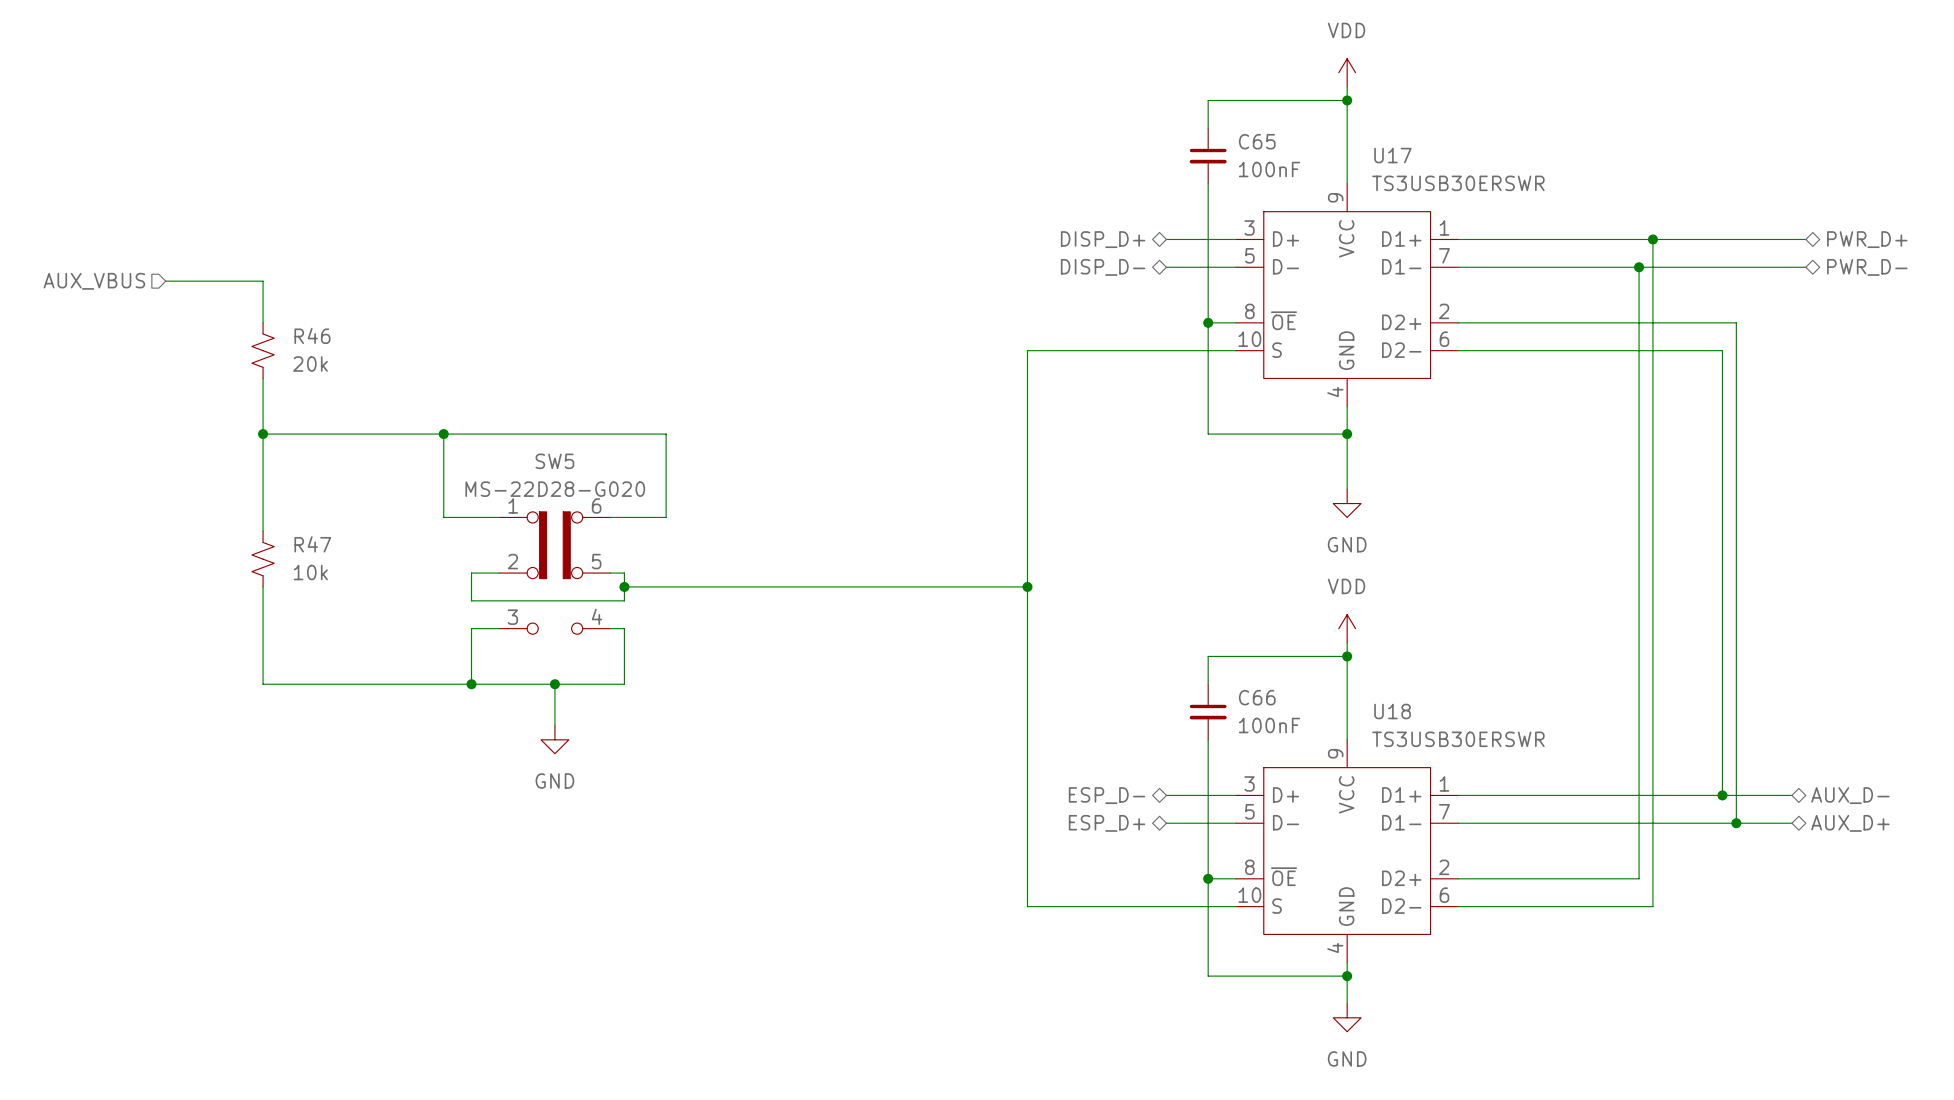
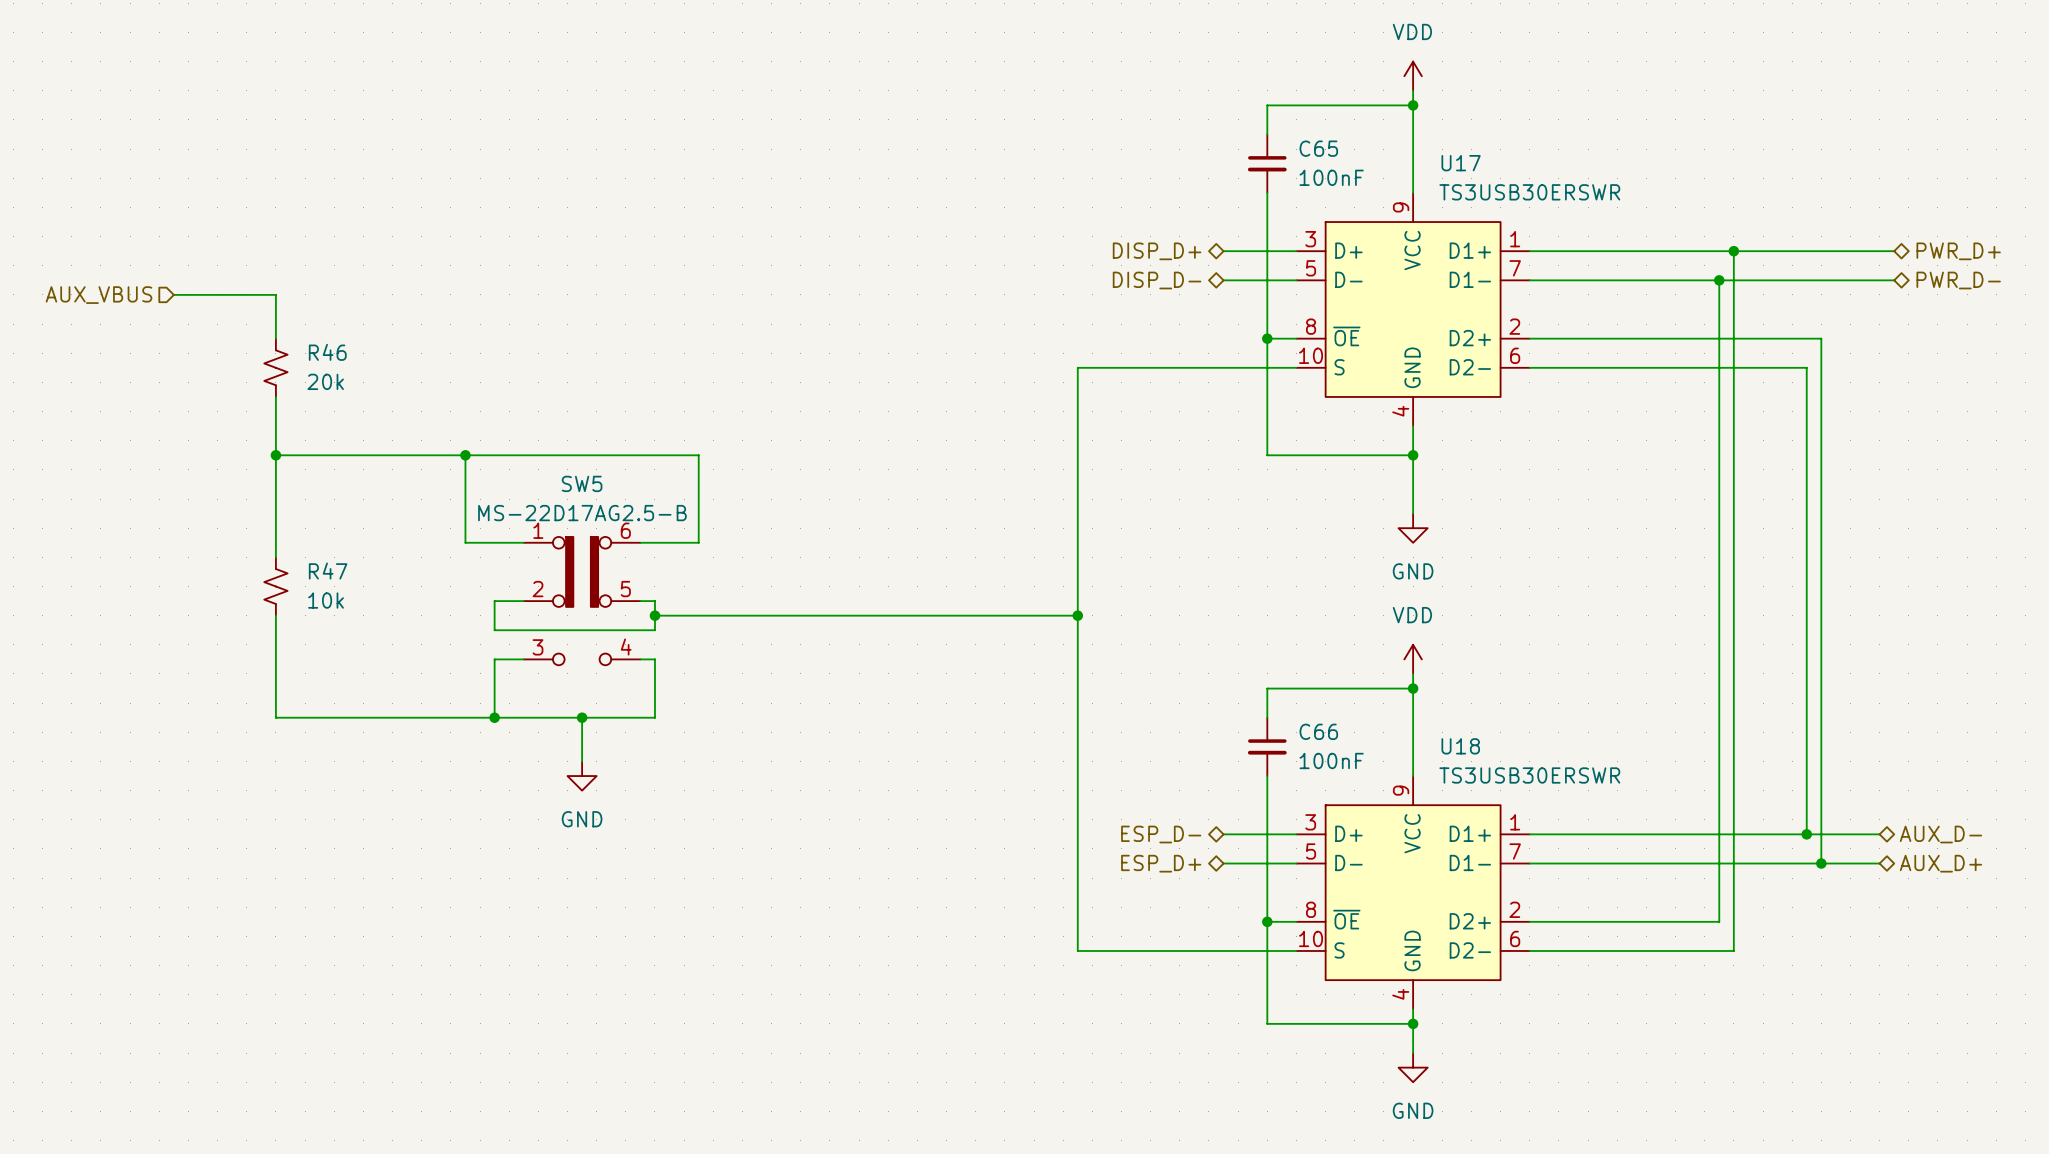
SW5 value: MS-22D28-G020 (555, 489) -> MS-22D17AG2.5-B (582, 513)

